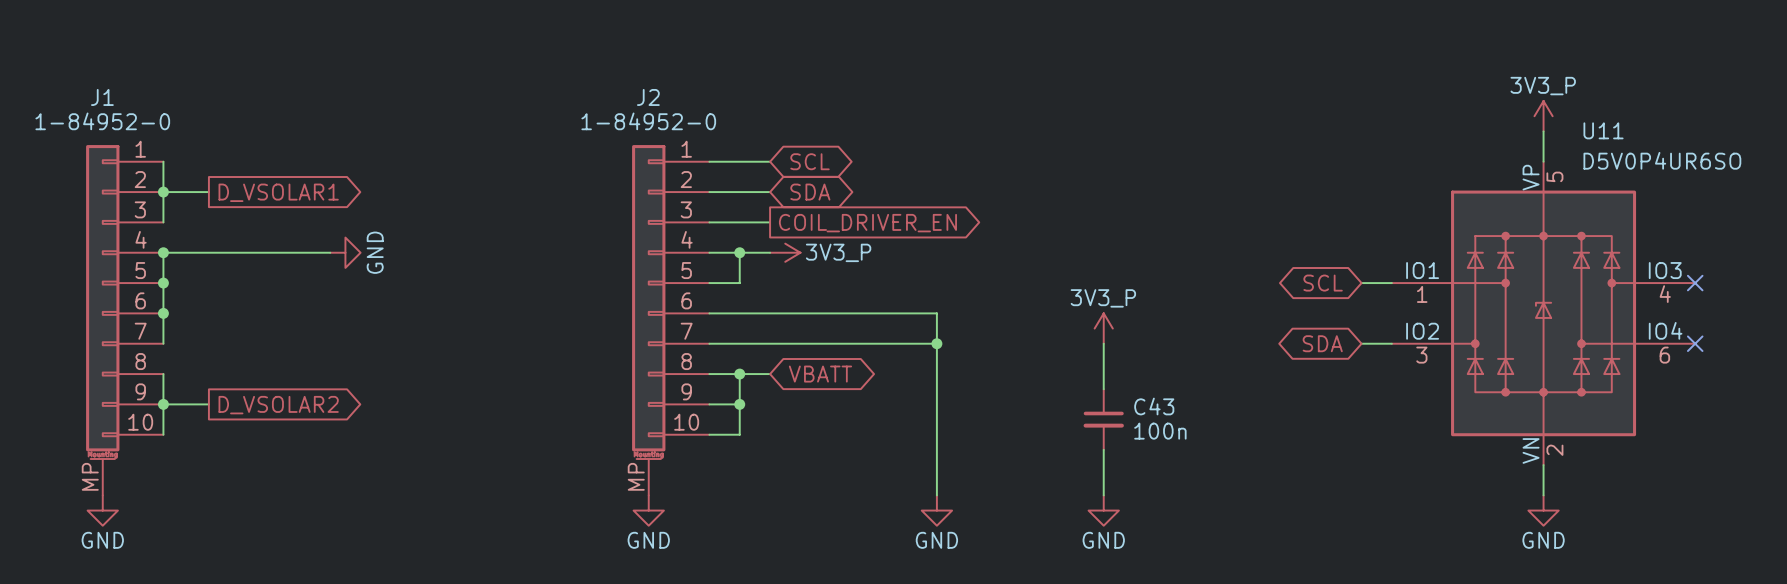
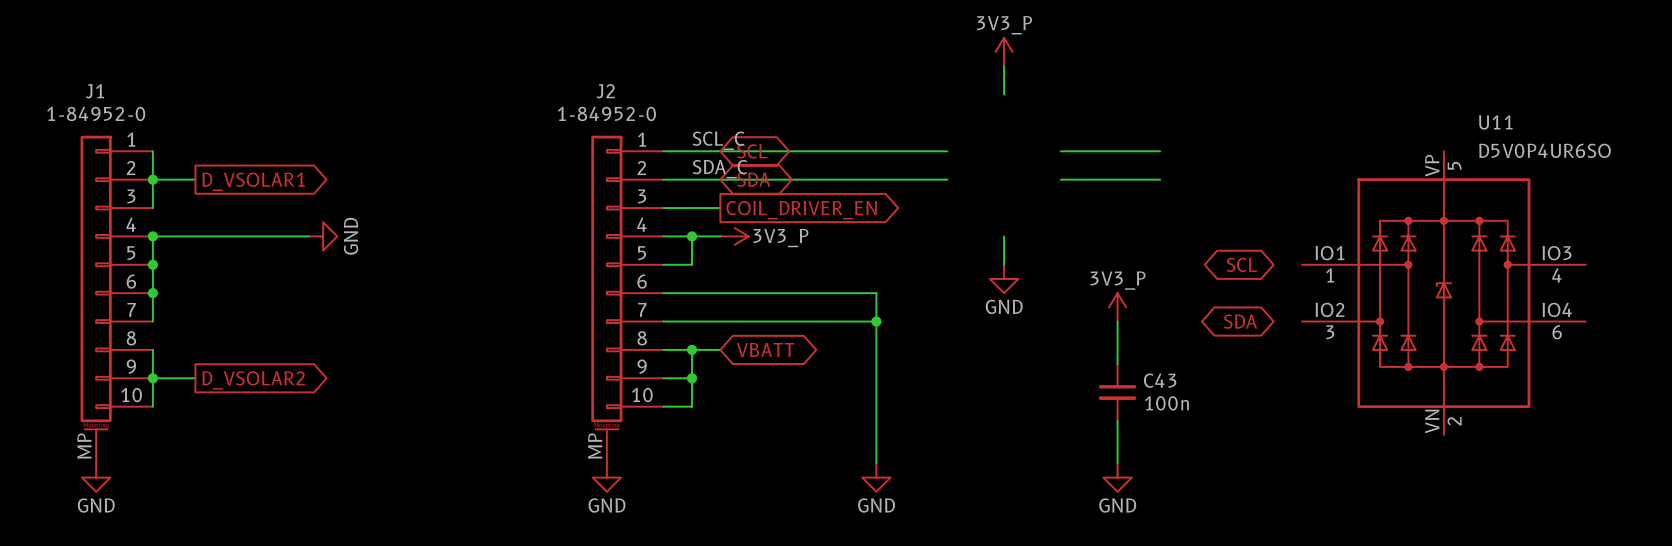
power symbol: none -> 3V3_P (1004, 51)
wire: none -> (1004, 66) (1004, 94)
power symbol: 3V3_P (1543, 116) -> none
wire: (1543, 131) (1543, 161) -> none
label: none -> SCL_C (718, 140)
wire: none -> (720, 151) (947, 151)
wire: none -> (1060, 151) (1160, 151)
label: none -> SDA_C (720, 169)
wire: none -> (720, 179) (947, 179)
wire: none -> (1060, 179) (1160, 179)
wire: none -> (1004, 236) (1004, 264)
wire: (1361, 283) (1391, 283) -> none
no-connect mark: (1695, 283) -> none
power symbol: none -> GND (1004, 278)
power symbol position: 3V3_P (1103, 328) -> 3V3_P (1117, 307)
wire: (1103, 343) (1103, 389) -> (1117, 321) (1117, 364)
wire: (1361, 343) (1391, 343) -> none
no-connect mark: (1695, 343) -> none
C43 position: (1103, 419) -> (1117, 392)
wire: (1103, 449) (1103, 495) -> (1117, 420) (1117, 463)
wire: (1543, 465) (1543, 495) -> none
power symbol position: GND (1103, 510) -> GND (1117, 477)
power symbol: GND (1543, 510) -> none

